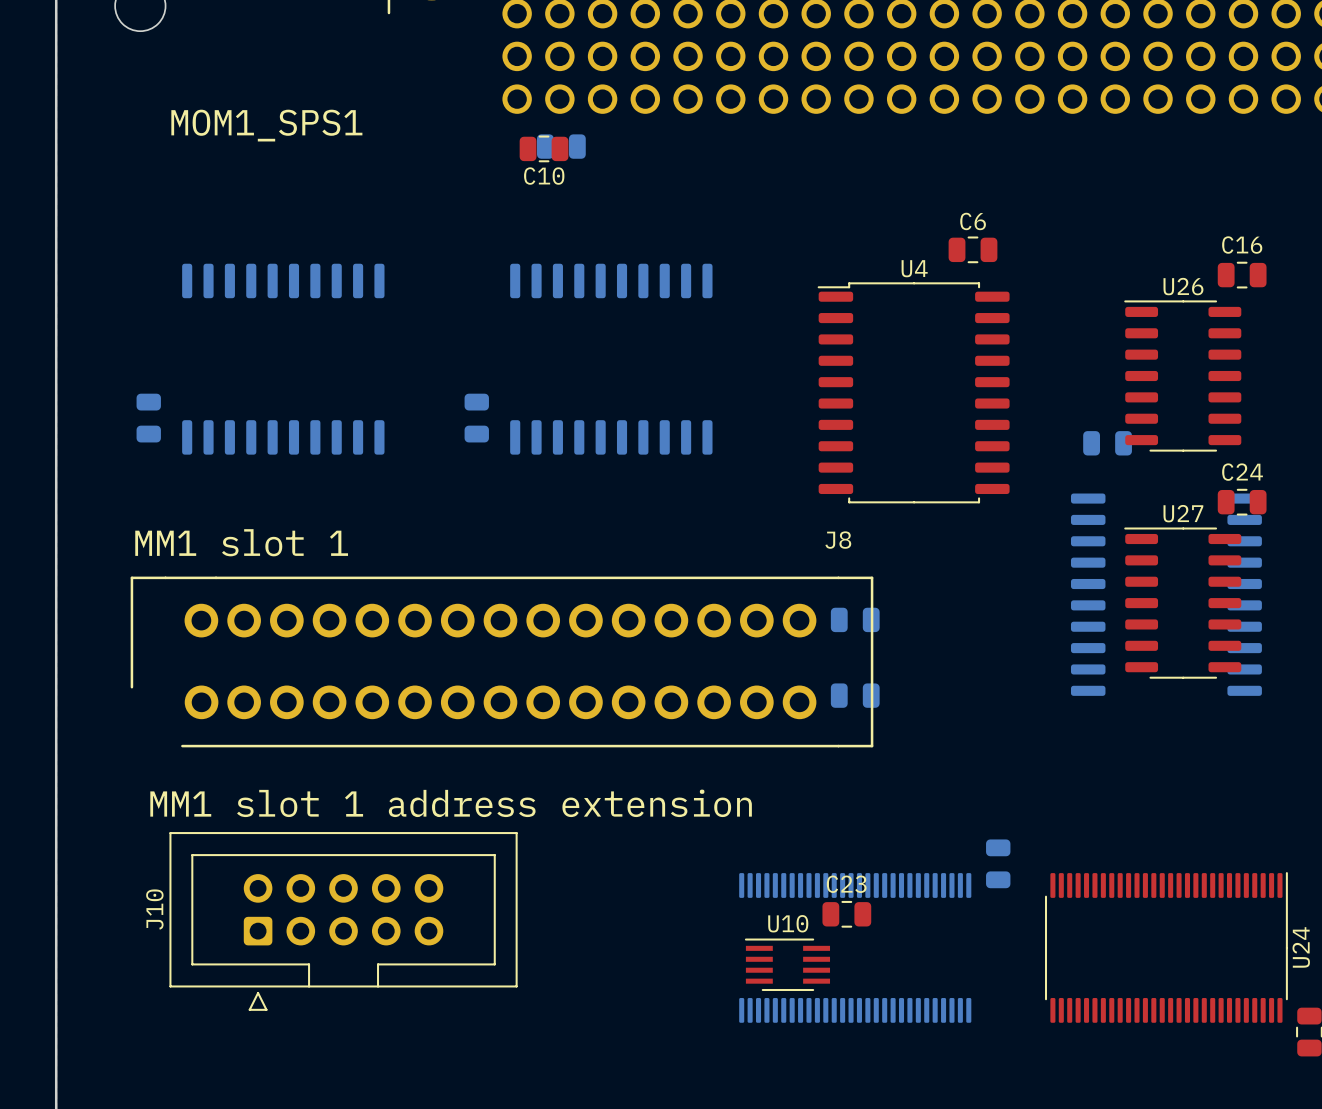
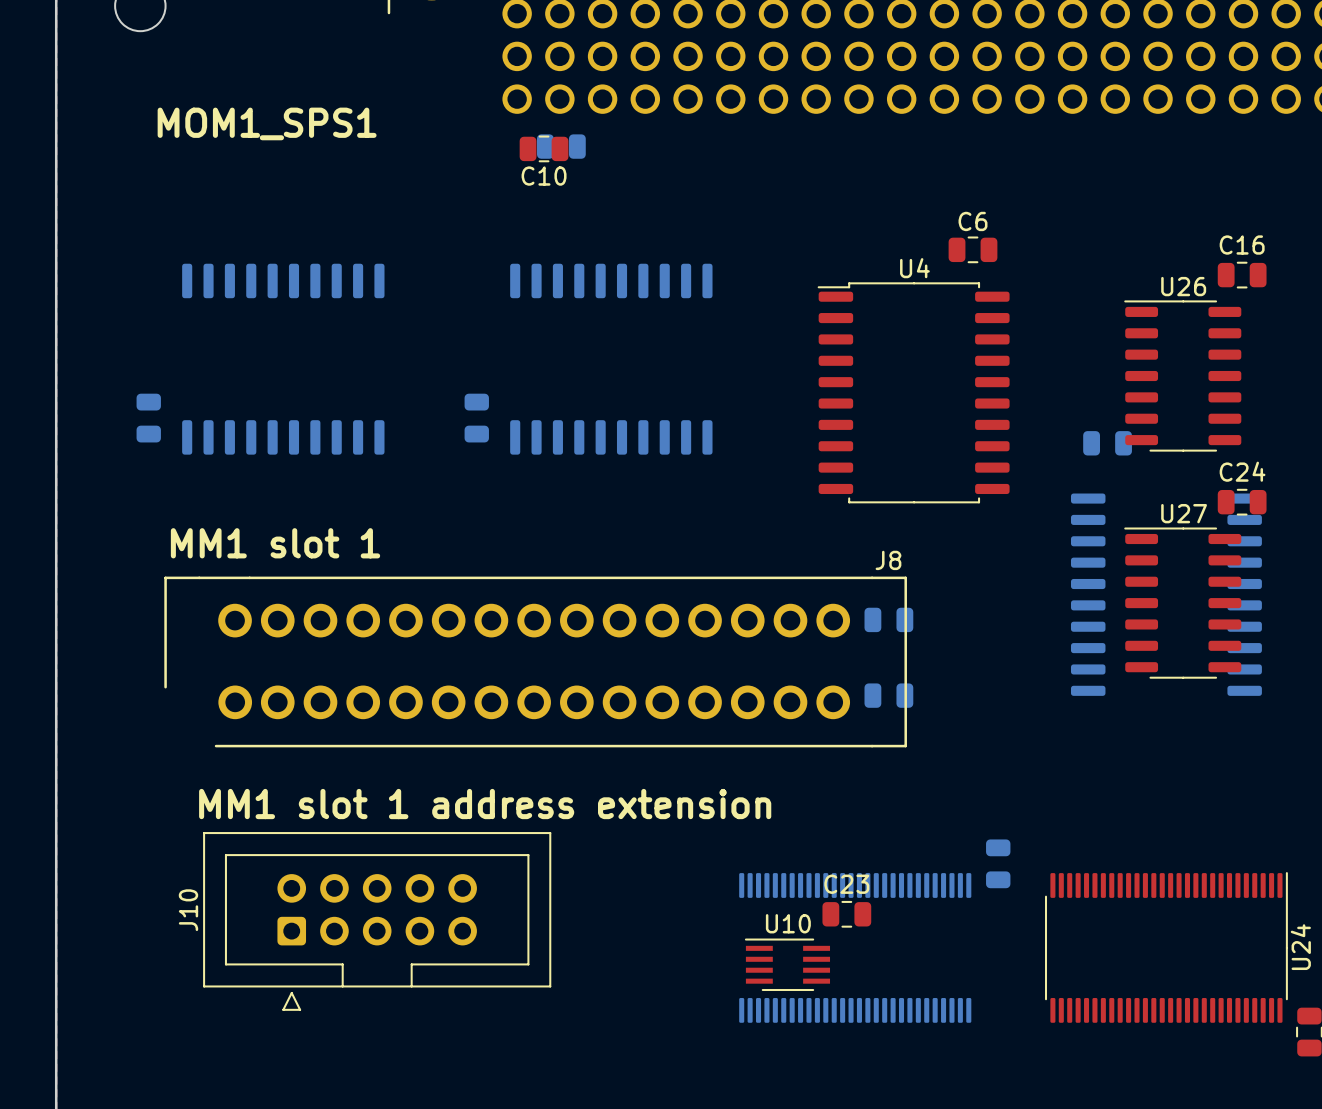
J8 name position: J8 (838, 540) -> J8 (888, 560)
text position: MM1 slot 1 (241, 542) -> MM1 slot 1 (275, 543)
part position: (855, 619) -> (888, 619)
J8 position: (502, 661) -> (535, 661)
part position: (855, 695) -> (888, 695)
text position: MM1 slot 1 address extension (451, 803) -> MM1 slot 1 address extension (485, 804)
J10 position: (343, 921) -> (377, 921)

